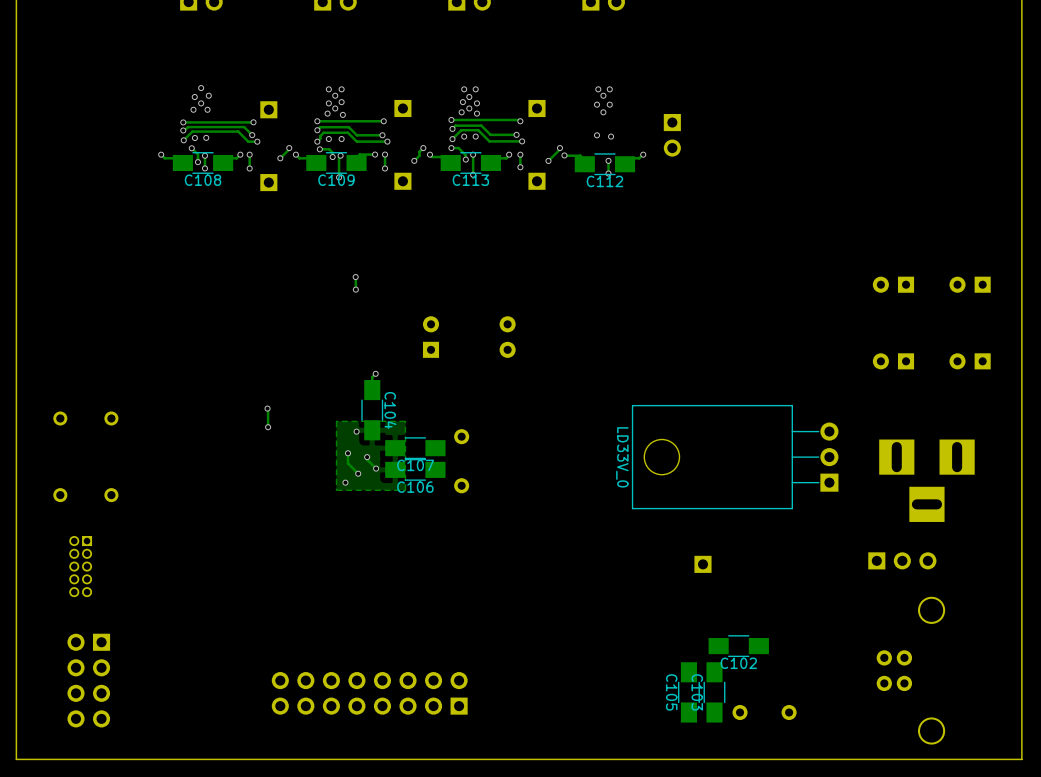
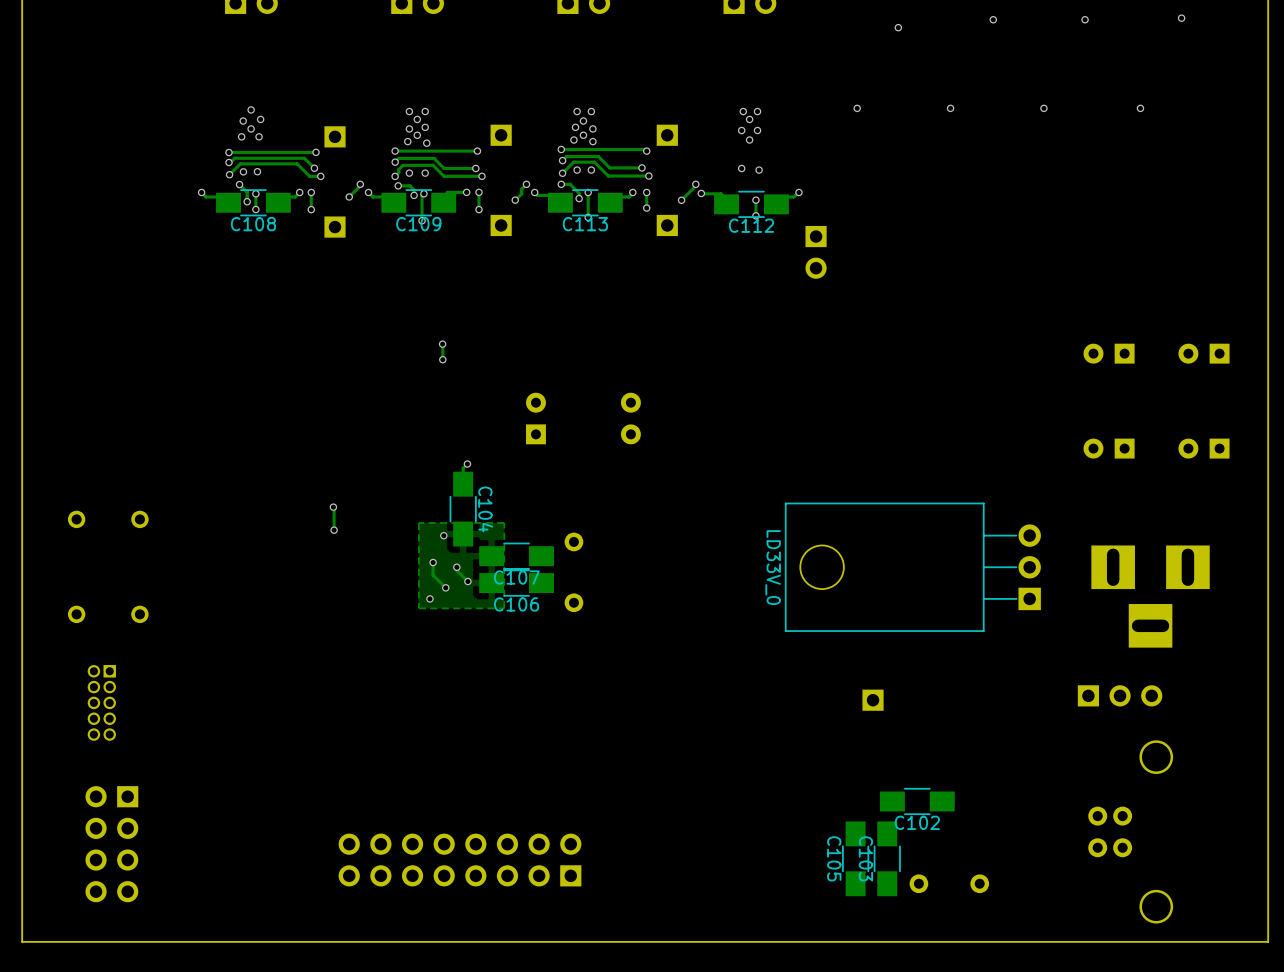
via: none -> (1181, 18)
via: none -> (993, 19)
via: none -> (1085, 19)
via: none -> (898, 27)
via: none -> (857, 108)
via: none -> (950, 108)
via: none -> (1043, 108)
via: none -> (1140, 108)
part position: (672, 135) -> (816, 252)

